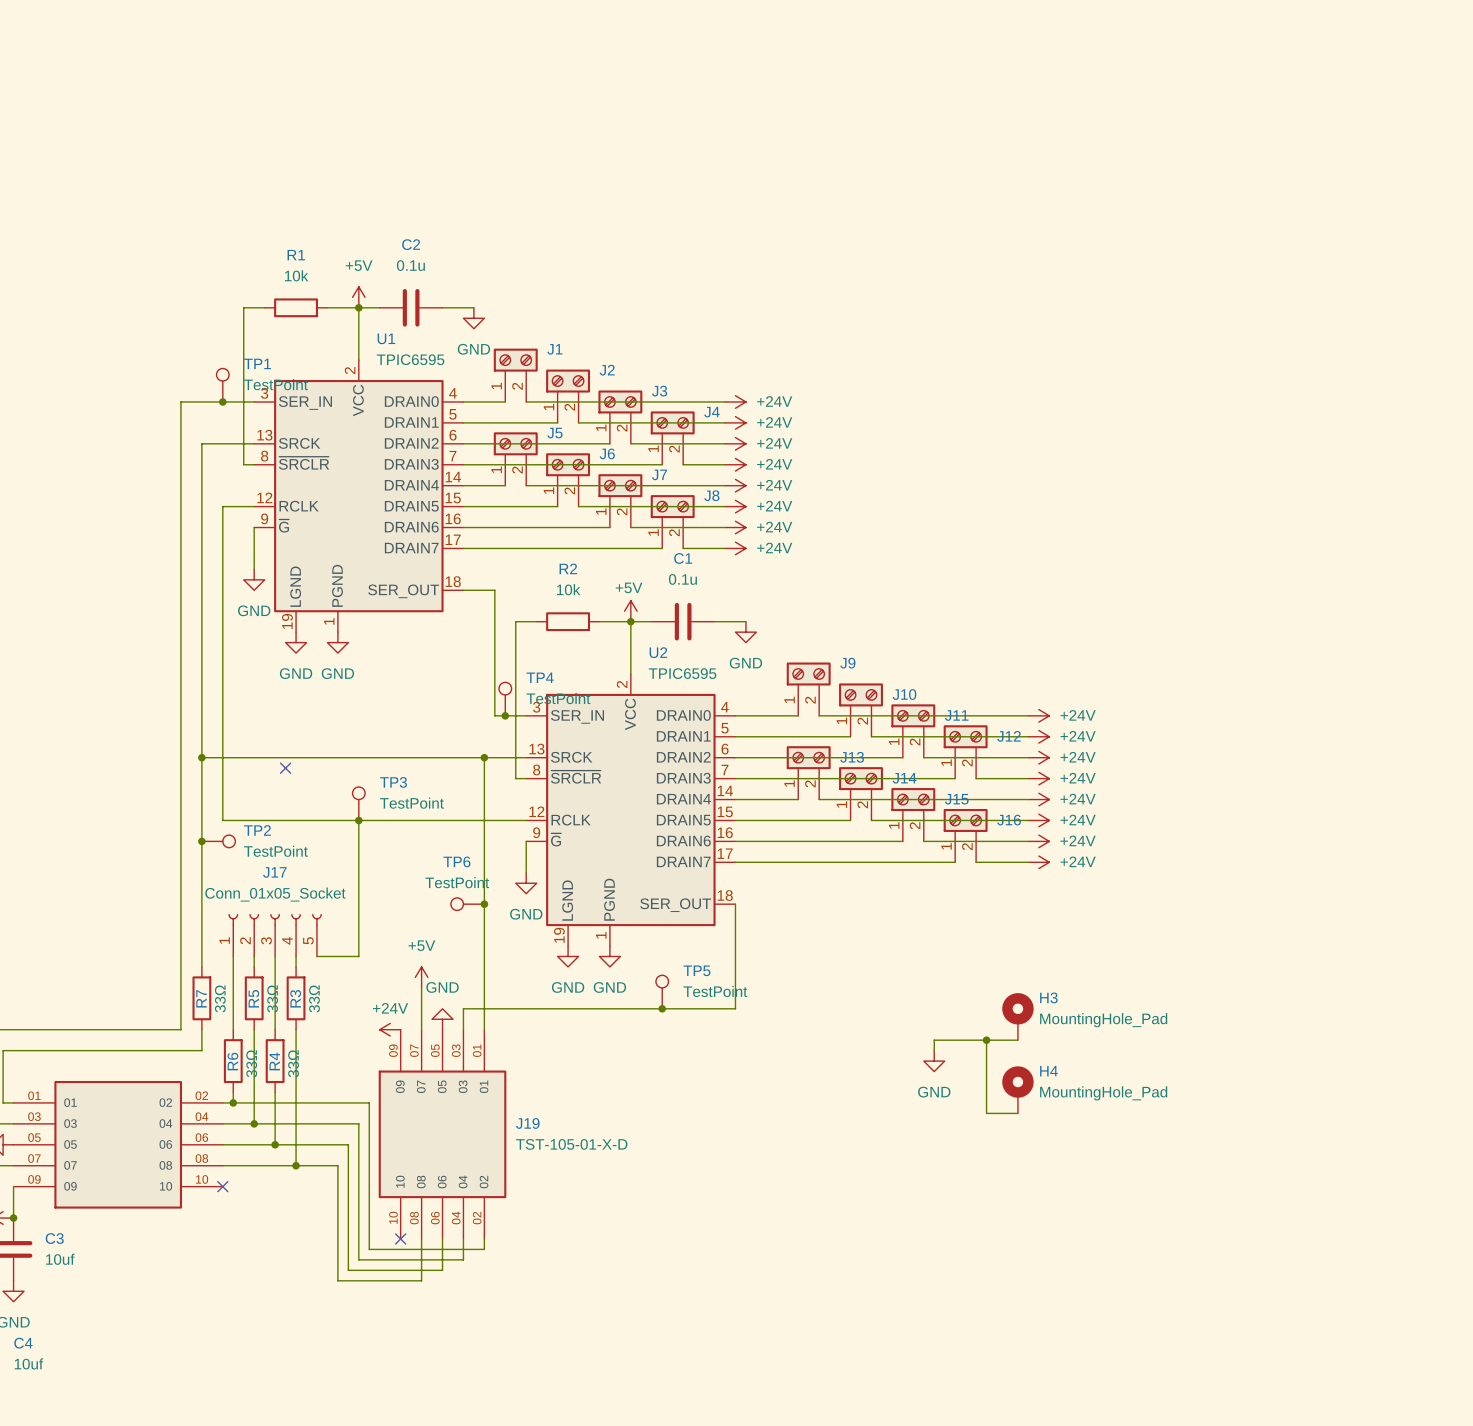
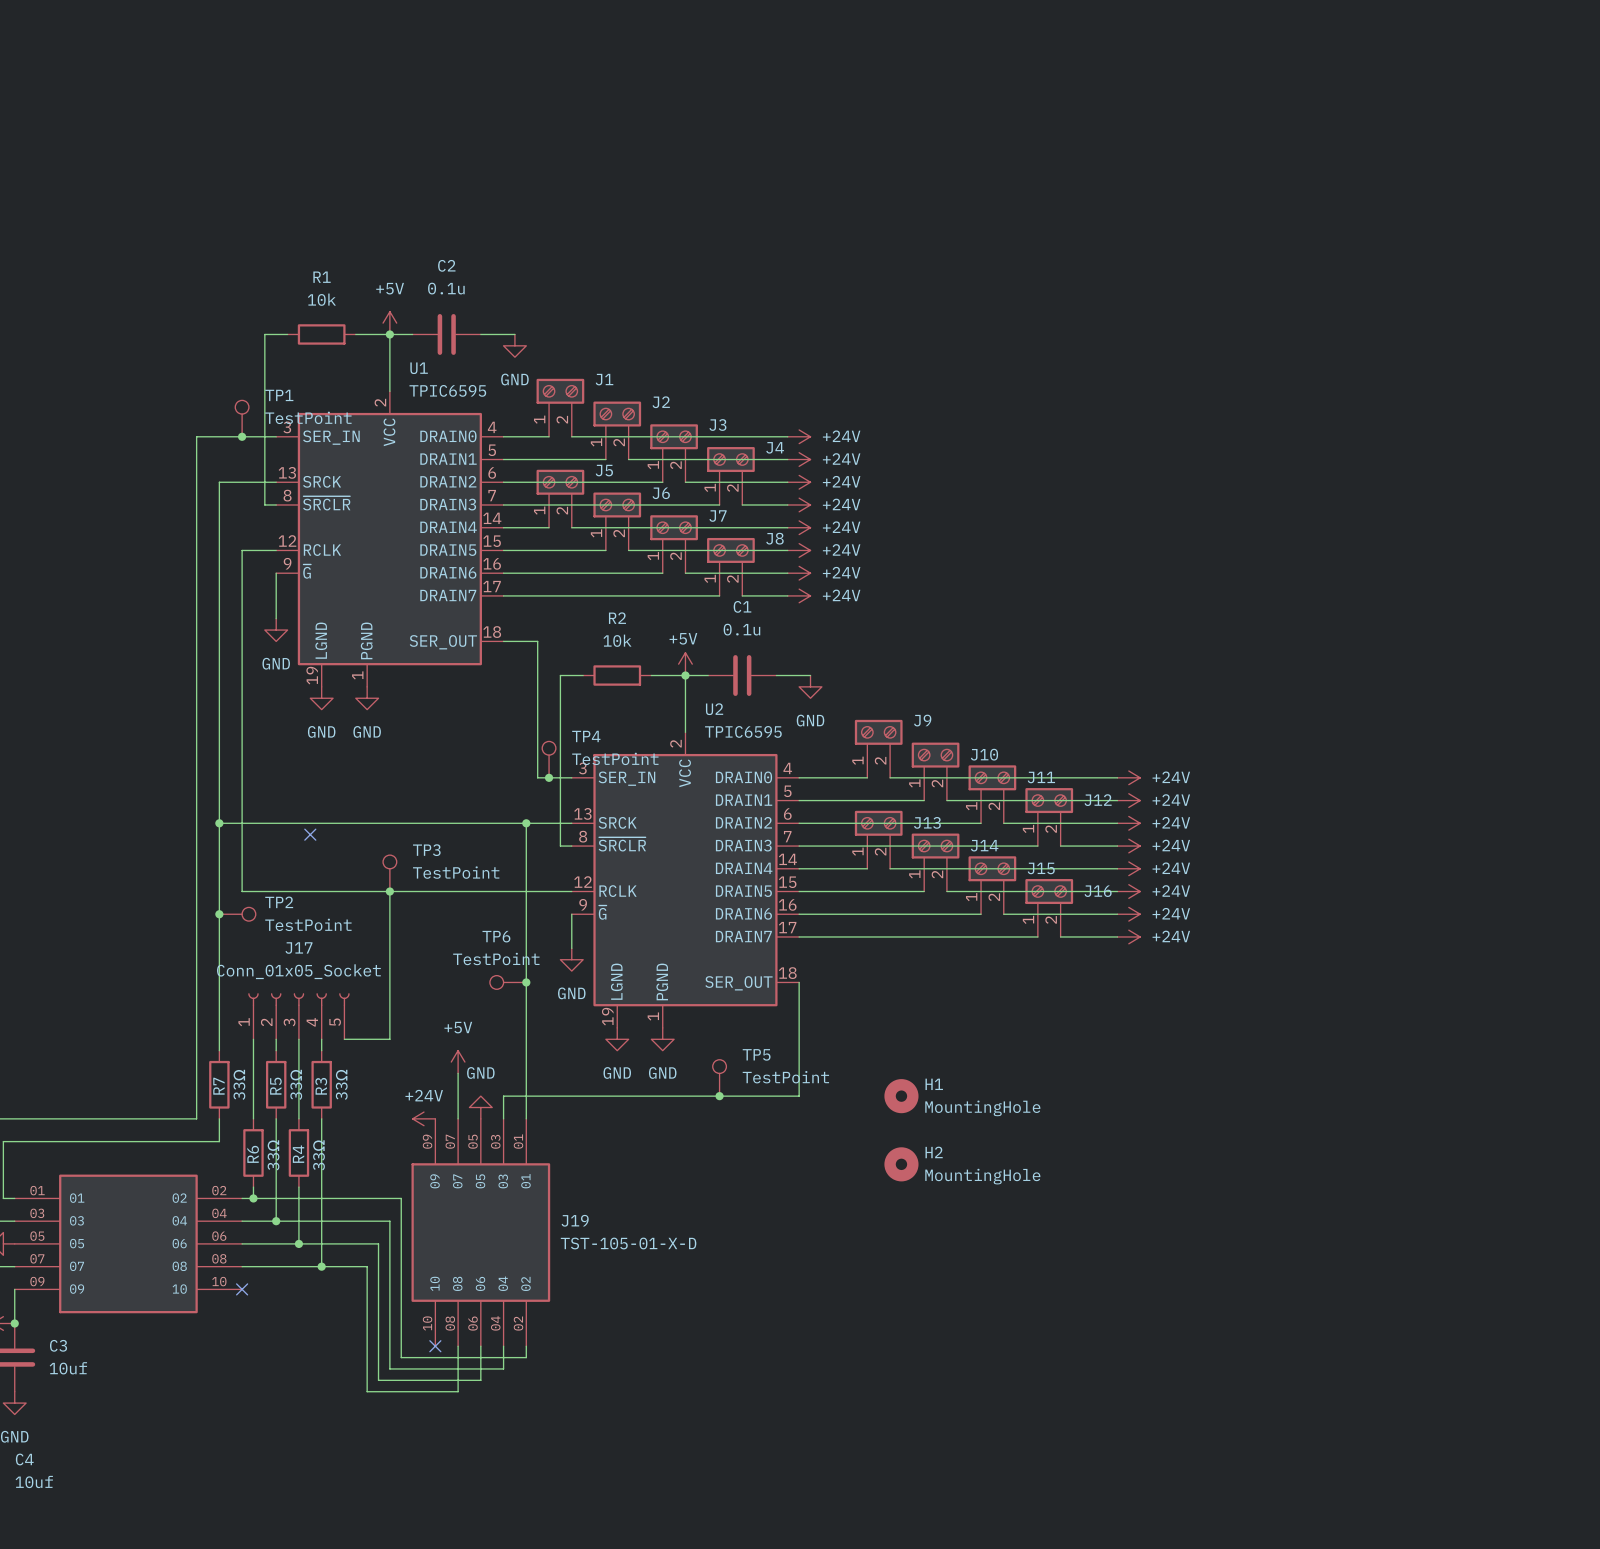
H1: none -> MountingHole (901, 1096)
H3: MountingHole_Pad (1017, 1016) -> none
wire: (986, 1040) (986, 1113) (1017, 1113) -> none
junction: (986, 1040) -> none
wire: (1017, 1040) (934, 1040) (934, 1050) -> none
power symbol: GND (934, 1061) -> none
H2: none -> MountingHole (901, 1164)
H4: MountingHole_Pad (1017, 1089) -> none

